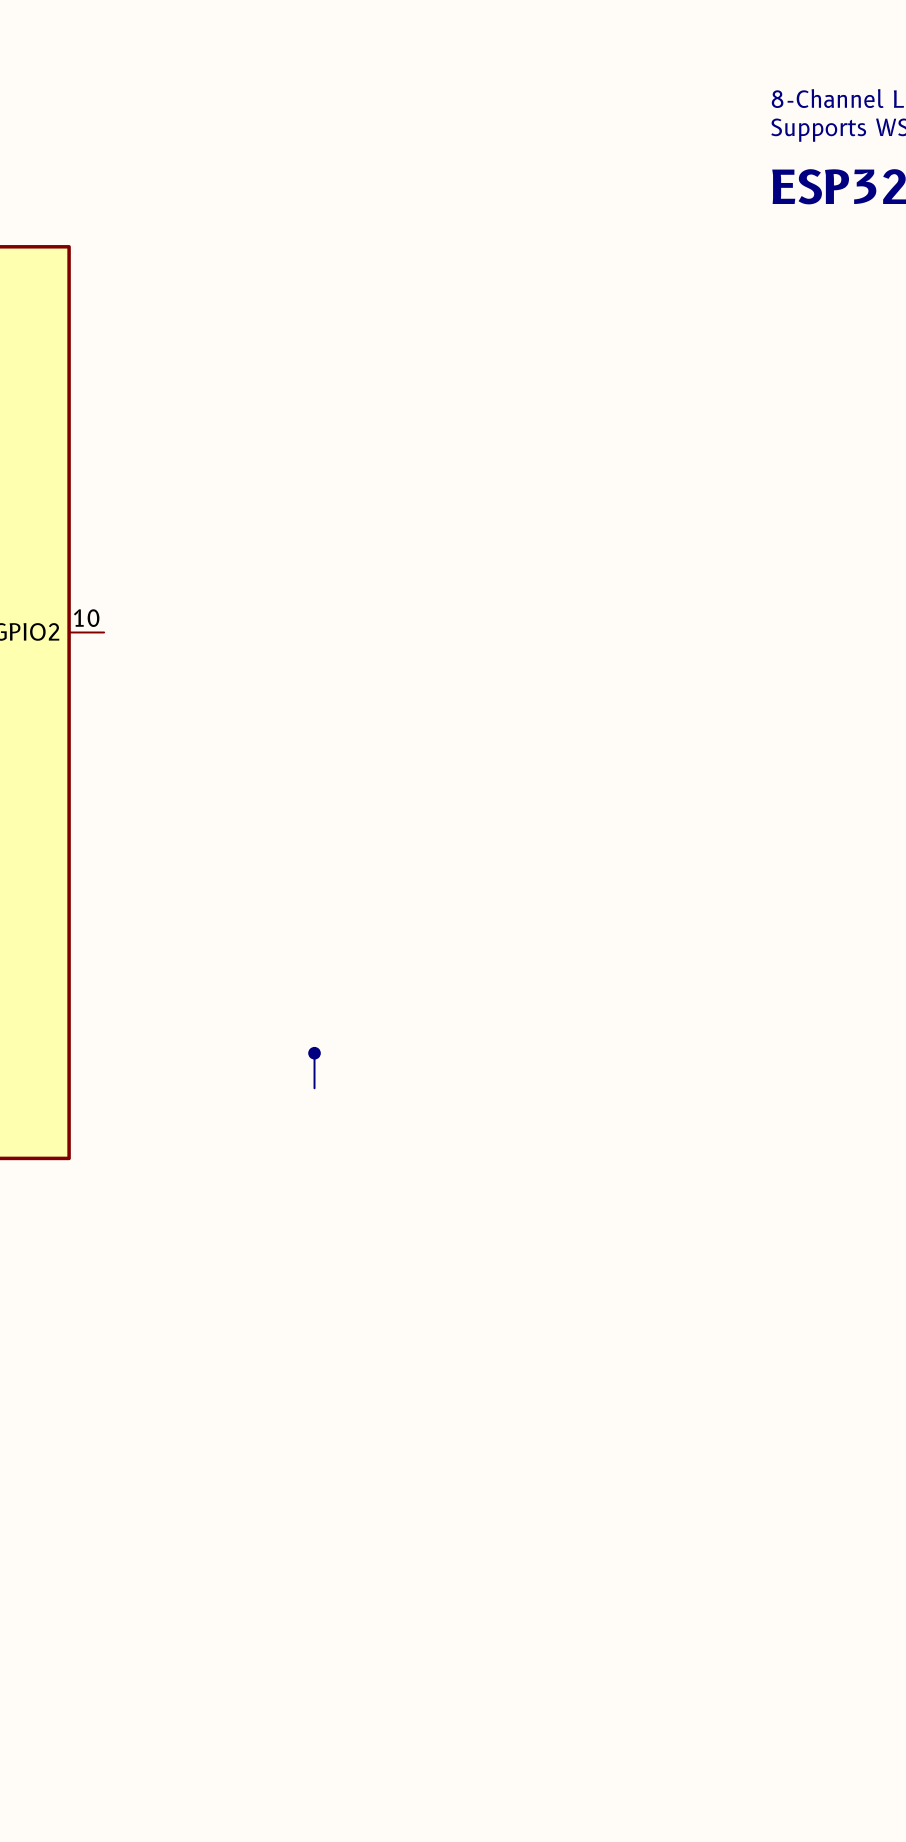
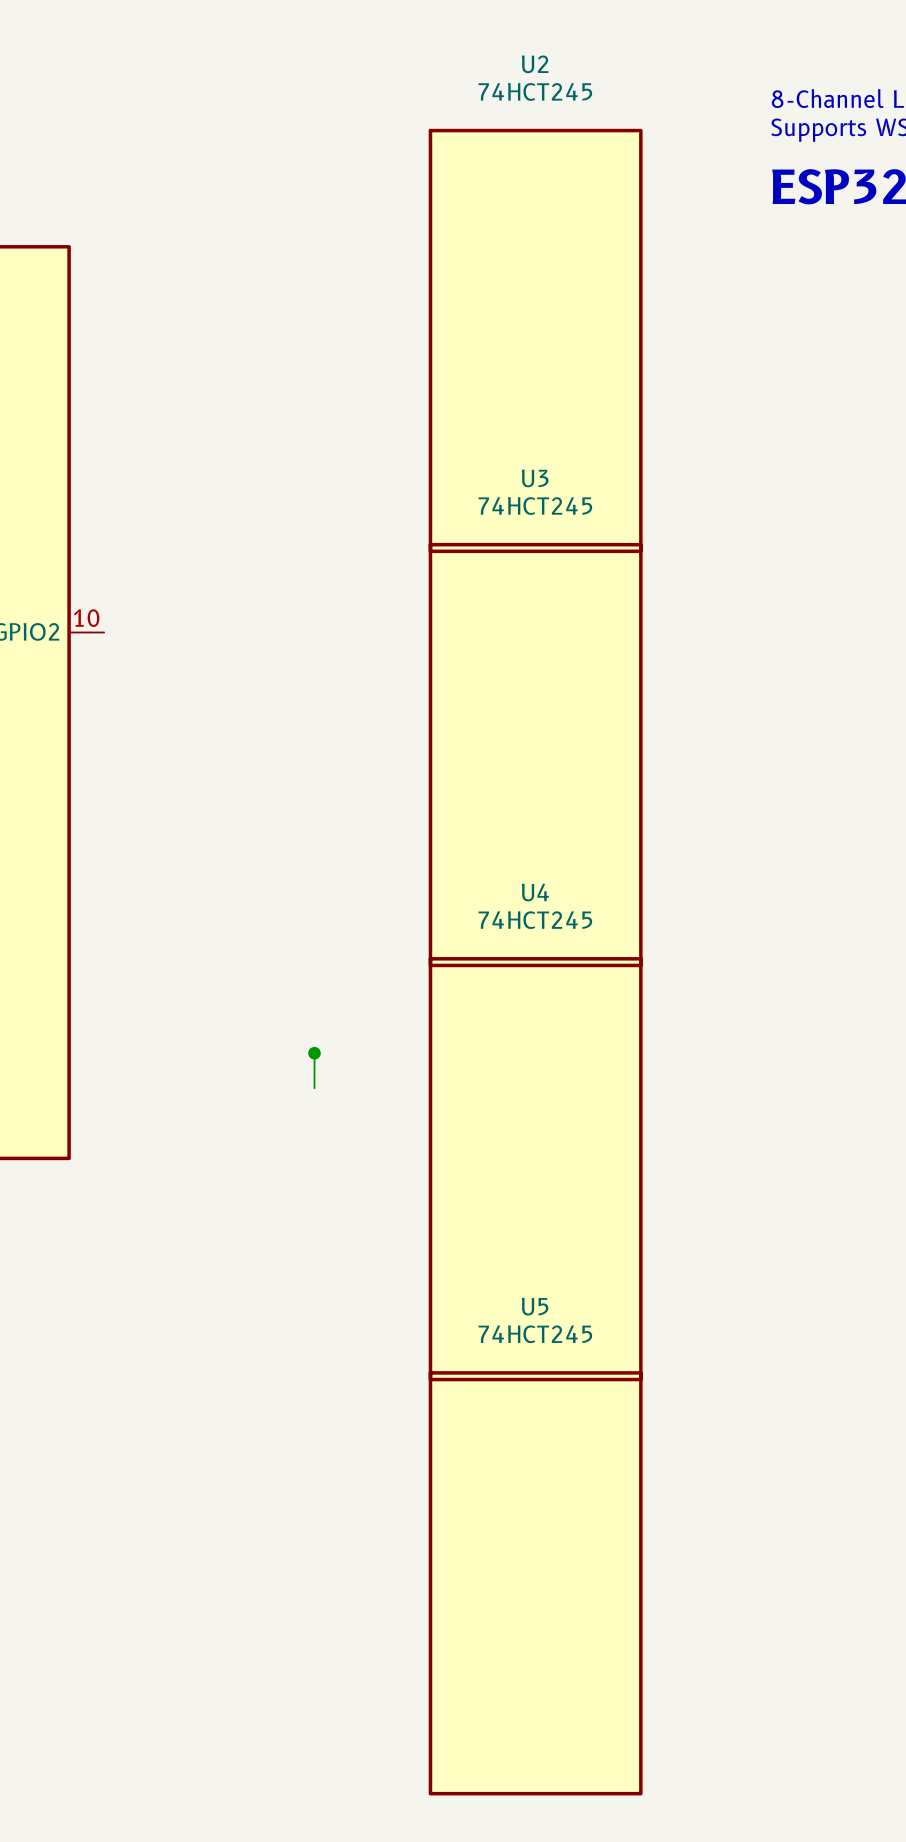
U2: none -> 74HCT245 (535, 340)
U3: none -> 74HCT245 (535, 755)
U4: none -> 74HCT245 (535, 1169)
U5: none -> 74HCT245 (535, 1583)

